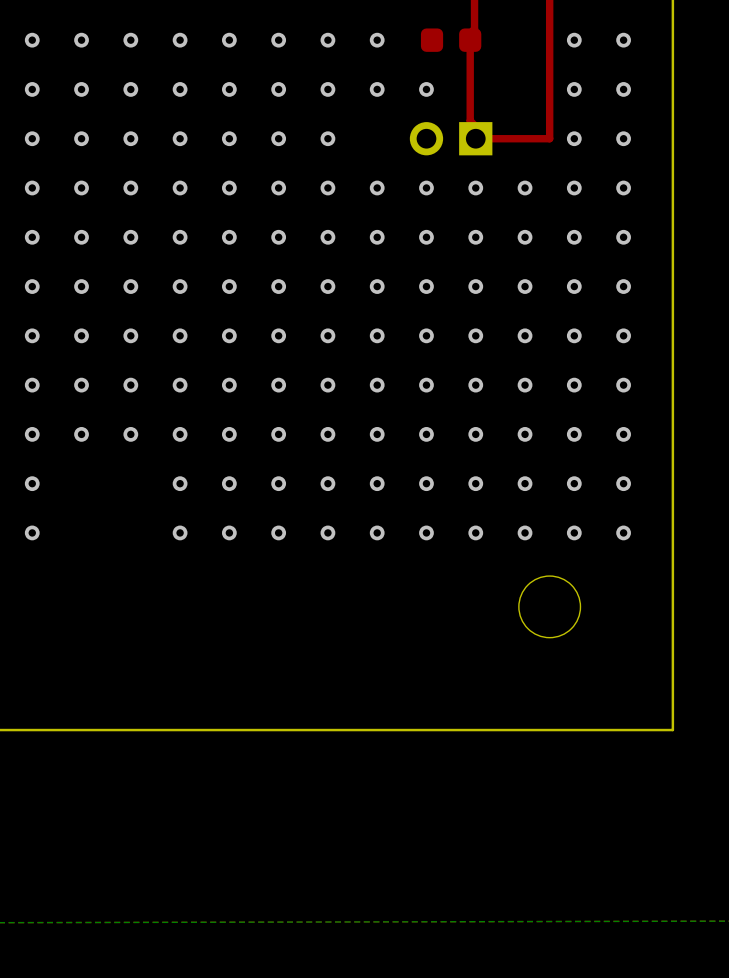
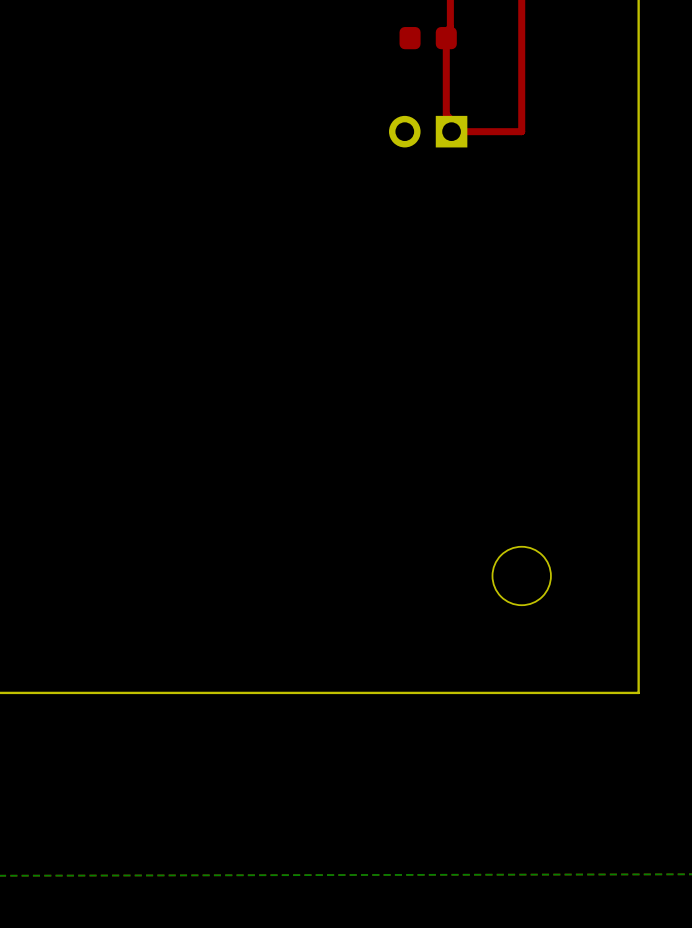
via: (32, 40) -> none
via: (81, 40) -> none
via: (130, 40) -> none
via: (180, 40) -> none
via: (229, 40) -> none
via: (278, 40) -> none
via: (327, 40) -> none
via: (377, 40) -> none
via: (574, 40) -> none
via: (623, 40) -> none
via: (32, 89) -> none
via: (81, 89) -> none
via: (130, 89) -> none
via: (180, 89) -> none
via: (229, 89) -> none
via: (278, 89) -> none
via: (327, 89) -> none
via: (377, 89) -> none
via: (426, 89) -> none
via: (574, 89) -> none
via: (623, 89) -> none
via: (32, 138) -> none
via: (81, 138) -> none
via: (130, 138) -> none
via: (180, 138) -> none
via: (229, 138) -> none
via: (278, 138) -> none
via: (327, 138) -> none
via: (574, 138) -> none
via: (623, 138) -> none
via: (32, 188) -> none
via: (81, 188) -> none
via: (130, 188) -> none
via: (180, 188) -> none
via: (229, 188) -> none
via: (278, 188) -> none
via: (327, 188) -> none
via: (377, 188) -> none
via: (426, 188) -> none
via: (475, 188) -> none
via: (525, 188) -> none
via: (574, 188) -> none
via: (623, 188) -> none
via: (32, 237) -> none
via: (81, 237) -> none
via: (130, 237) -> none
via: (180, 237) -> none
via: (229, 237) -> none
via: (278, 237) -> none
via: (327, 237) -> none
via: (377, 237) -> none
via: (426, 237) -> none
via: (475, 237) -> none
via: (525, 237) -> none
via: (574, 237) -> none
via: (623, 237) -> none
via: (32, 286) -> none
via: (81, 286) -> none
via: (130, 286) -> none
via: (180, 286) -> none
via: (229, 286) -> none
via: (278, 286) -> none
via: (327, 286) -> none
via: (377, 286) -> none
via: (426, 286) -> none
via: (475, 286) -> none
via: (525, 286) -> none
via: (574, 286) -> none
via: (623, 286) -> none
via: (32, 335) -> none
via: (81, 335) -> none
via: (130, 335) -> none
via: (180, 335) -> none
via: (229, 335) -> none
via: (278, 335) -> none
via: (327, 335) -> none
via: (377, 335) -> none
via: (426, 335) -> none
via: (475, 335) -> none
via: (525, 335) -> none
via: (574, 335) -> none
via: (623, 335) -> none
via: (32, 385) -> none
via: (81, 385) -> none
via: (130, 385) -> none
via: (180, 385) -> none
via: (229, 385) -> none
via: (278, 385) -> none
via: (327, 385) -> none
via: (377, 385) -> none
via: (426, 385) -> none
via: (475, 385) -> none
via: (525, 385) -> none
via: (574, 385) -> none
via: (623, 385) -> none
via: (32, 434) -> none
via: (81, 434) -> none
via: (130, 434) -> none
via: (180, 434) -> none
via: (229, 434) -> none
via: (278, 434) -> none
via: (327, 434) -> none
via: (377, 434) -> none
via: (426, 434) -> none
via: (475, 434) -> none
via: (525, 434) -> none
via: (574, 434) -> none
via: (623, 434) -> none
via: (32, 483) -> none
via: (180, 483) -> none
via: (229, 483) -> none
via: (278, 483) -> none
via: (327, 483) -> none
via: (377, 483) -> none
via: (426, 483) -> none
via: (475, 483) -> none
via: (525, 483) -> none
via: (574, 483) -> none
via: (623, 483) -> none
via: (32, 532) -> none
via: (180, 532) -> none
via: (229, 532) -> none
via: (278, 532) -> none
via: (327, 532) -> none
via: (377, 532) -> none
via: (426, 532) -> none
via: (475, 532) -> none
via: (525, 532) -> none
via: (574, 532) -> none
via: (623, 532) -> none

